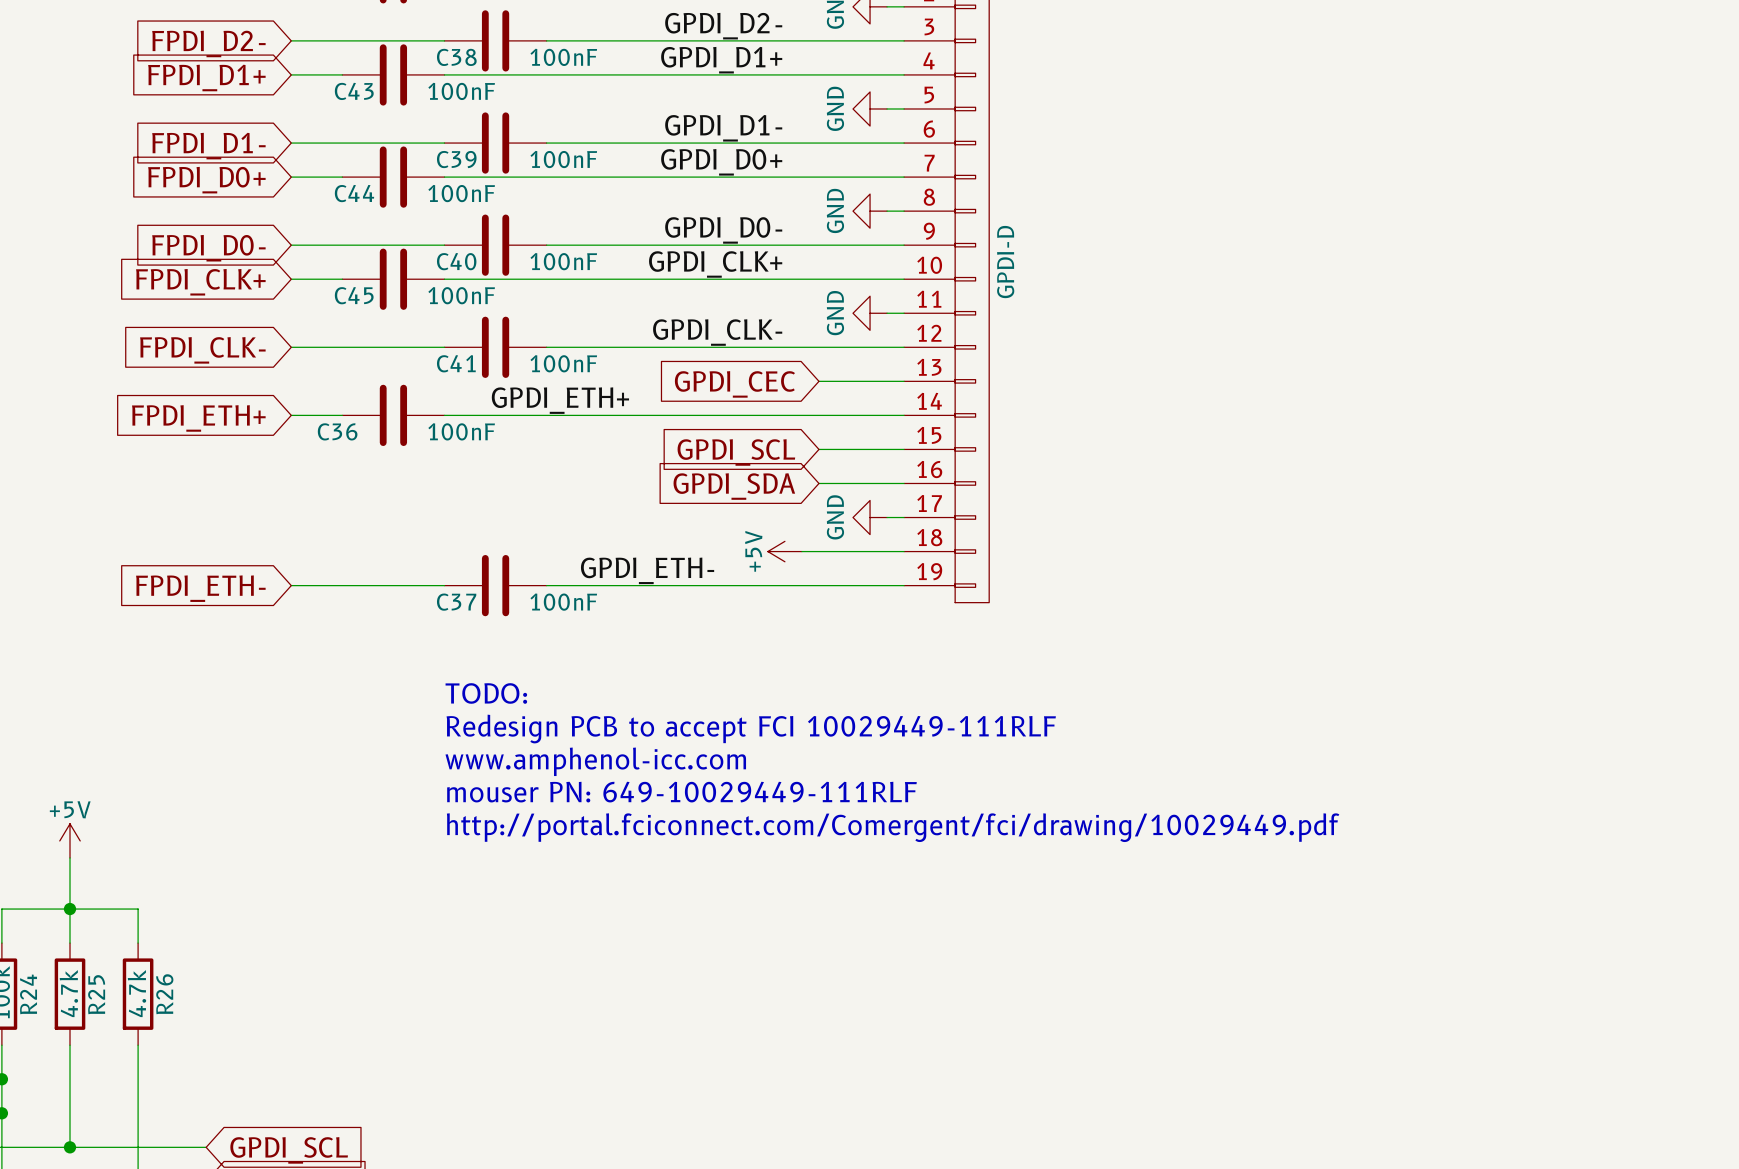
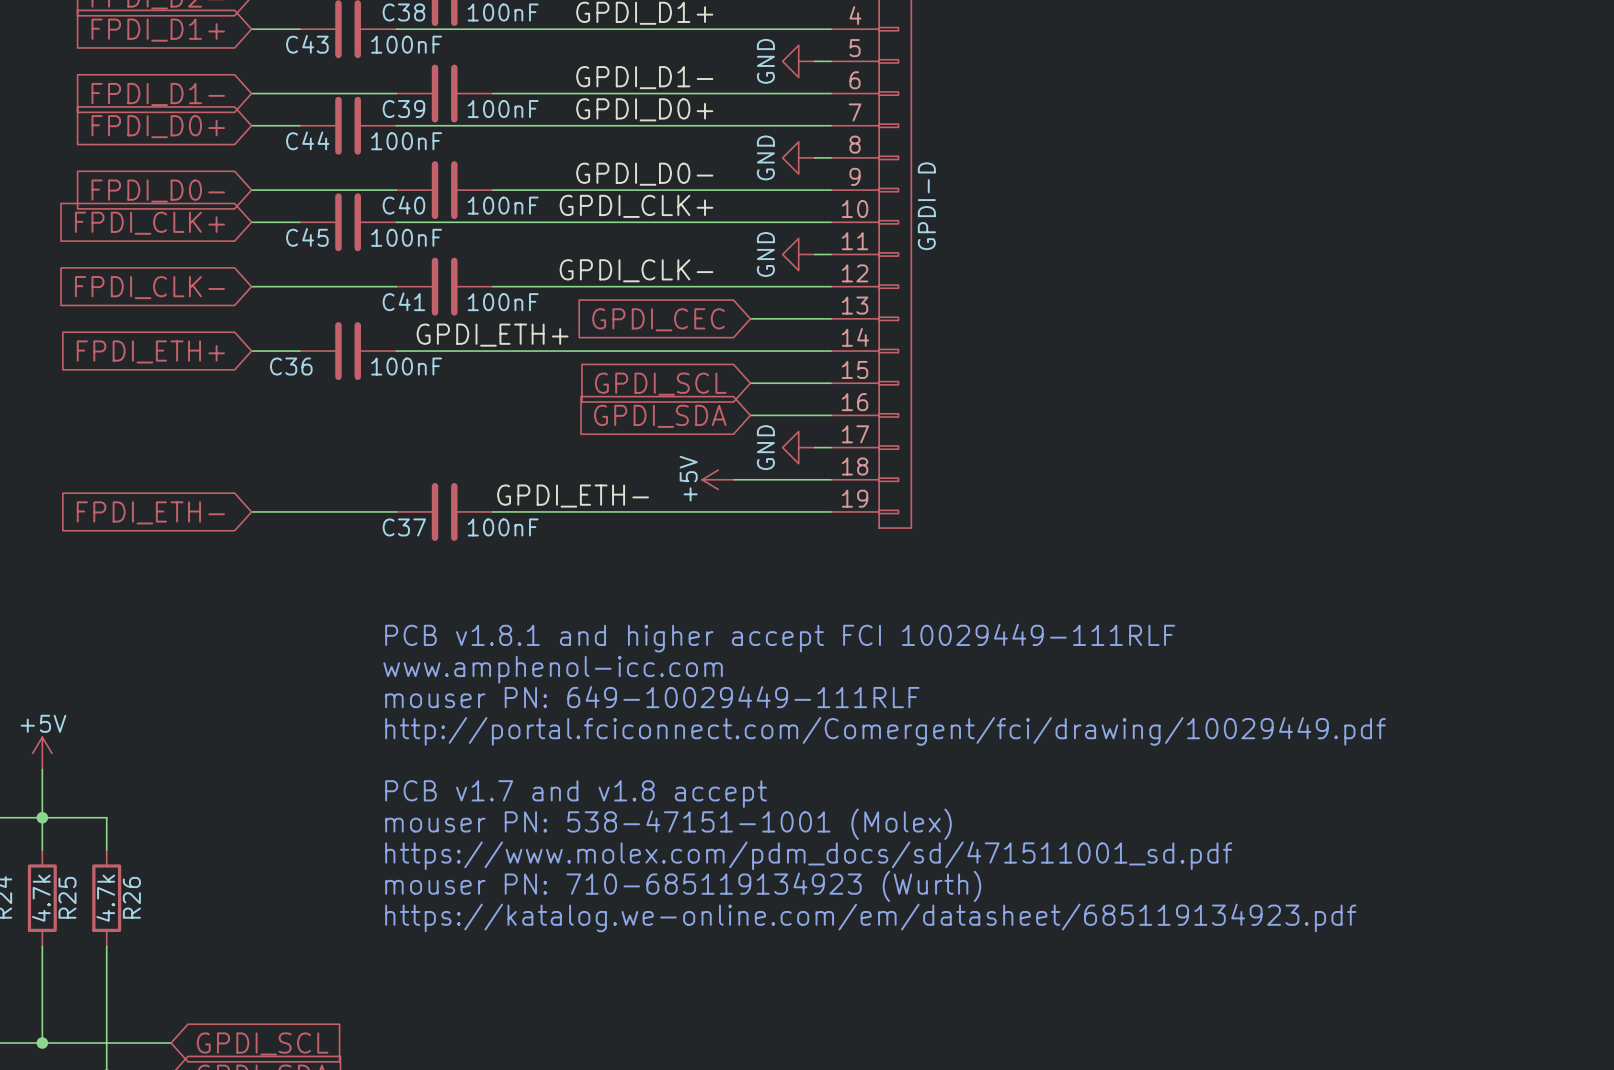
text: TODO: (486, 693) -> none
text: Redesign PCB to accept FCI 10029449-111RLF (751, 729) -> PCB v1.8.1 and higher accept FCI 10029449-111RLF (780, 638)
text position: www.amphenol-icc.com (595, 761) -> www.amphenol-icc.com (553, 669)
text position: mouser PN: 649-10029449-111RLF (681, 792) -> mouser PN: 649-10029449-111RLF (652, 697)
text position: http://portal.fciconnect.com/Comergent/fci/drawing/10029449.pdf (893, 827) -> http://portal.fciconnect.com/Comergent/fci/drawing/10029449.pdf (885, 731)
text: none -> PCB v1.7 and v1.8 accept (576, 794)
text: none -> mouser PN: 538-47151-1001 (Molex) (668, 824)
text: none -> https://www.molex.com/pdm_docs/sd/471511001_sd.pdf (808, 855)
text: none -> mouser PN: 710-685119134923 (Wurth) (683, 886)
text: none -> https://katalog.we-online.com/em/datasheet/685119134923.pdf (870, 917)

